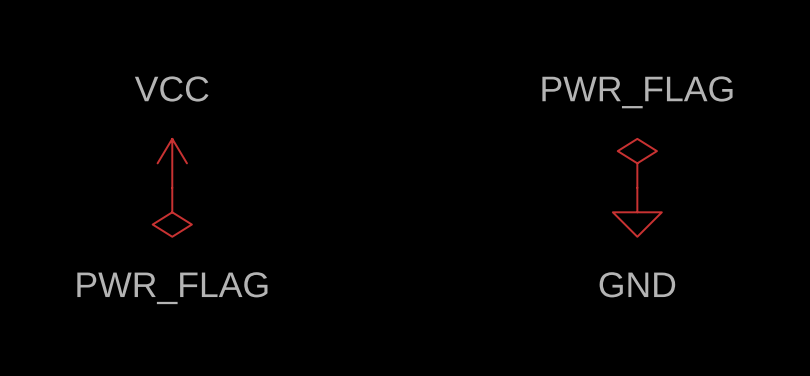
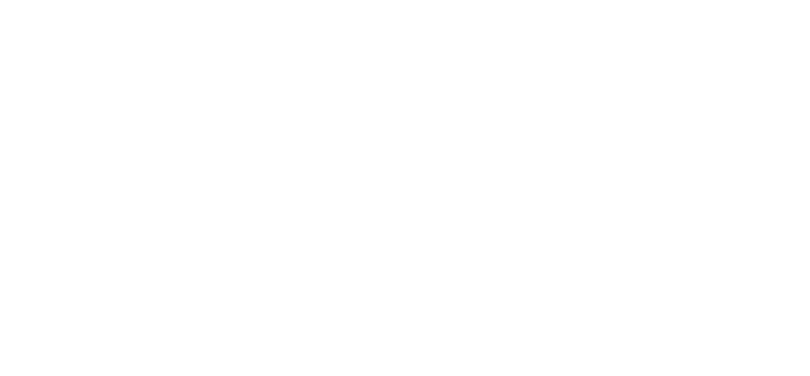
power symbol: VCC (172, 163) -> none
power symbol: PWR_FLAG (637, 163) -> none
power symbol: PWR_FLAG (172, 212) -> none
power symbol: GND (637, 212) -> none

